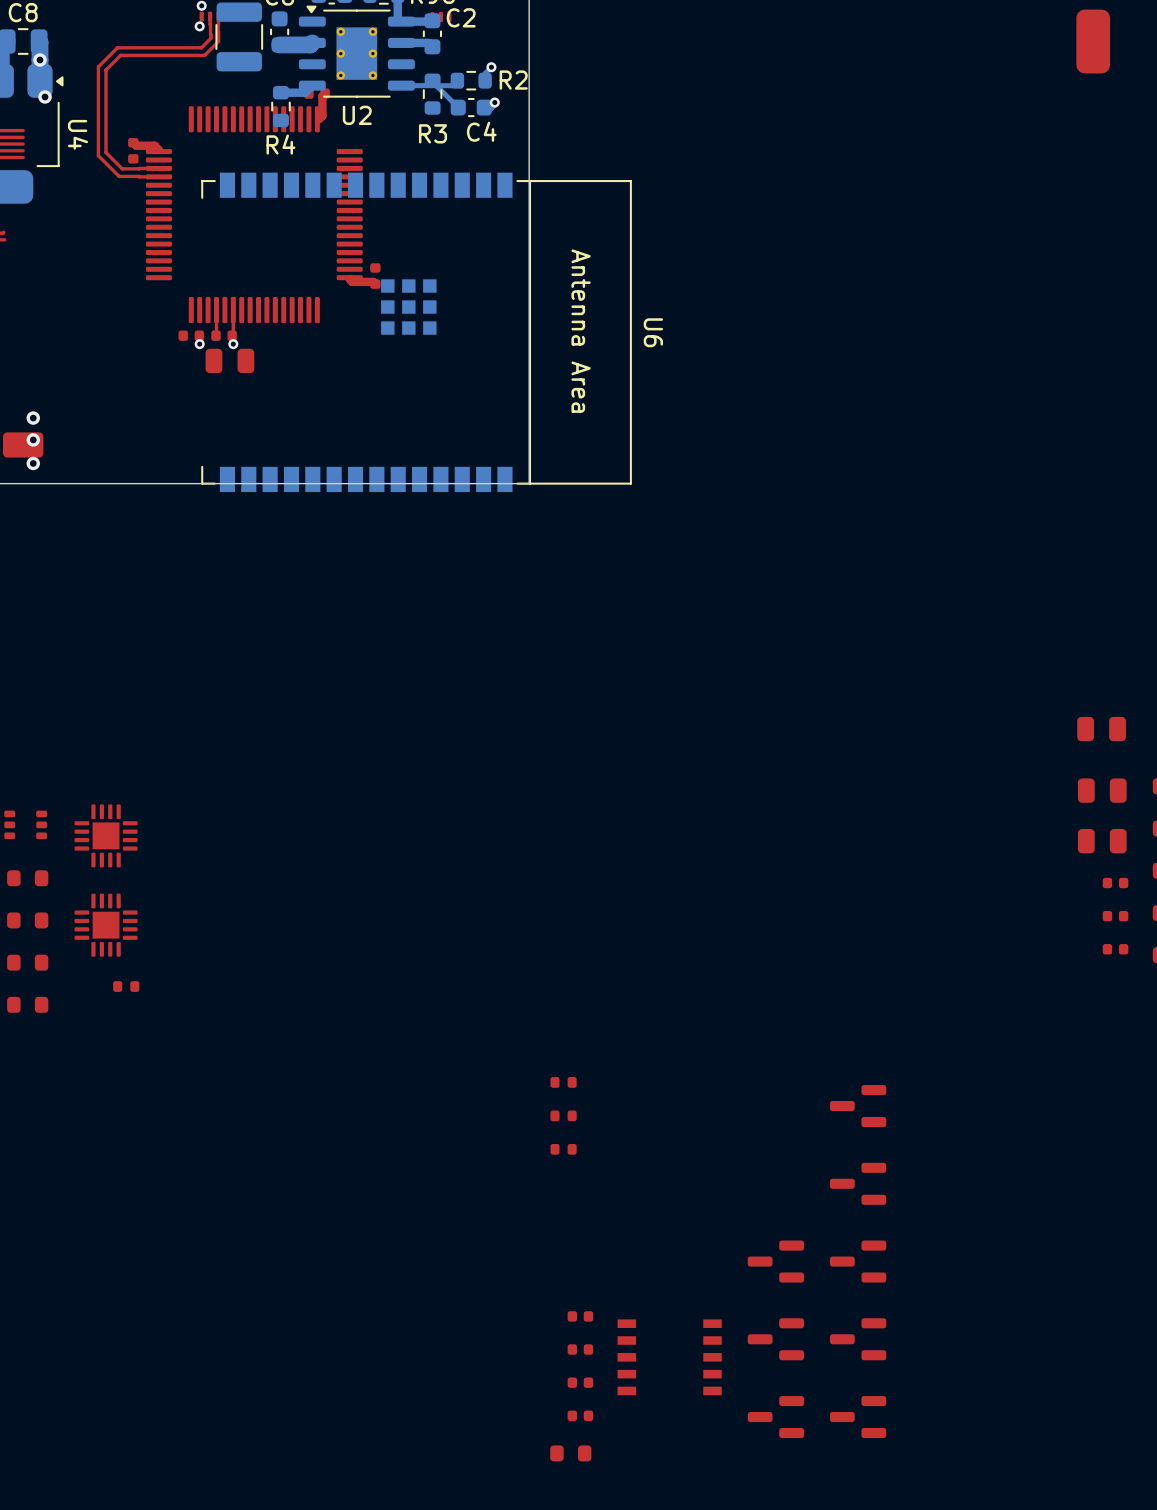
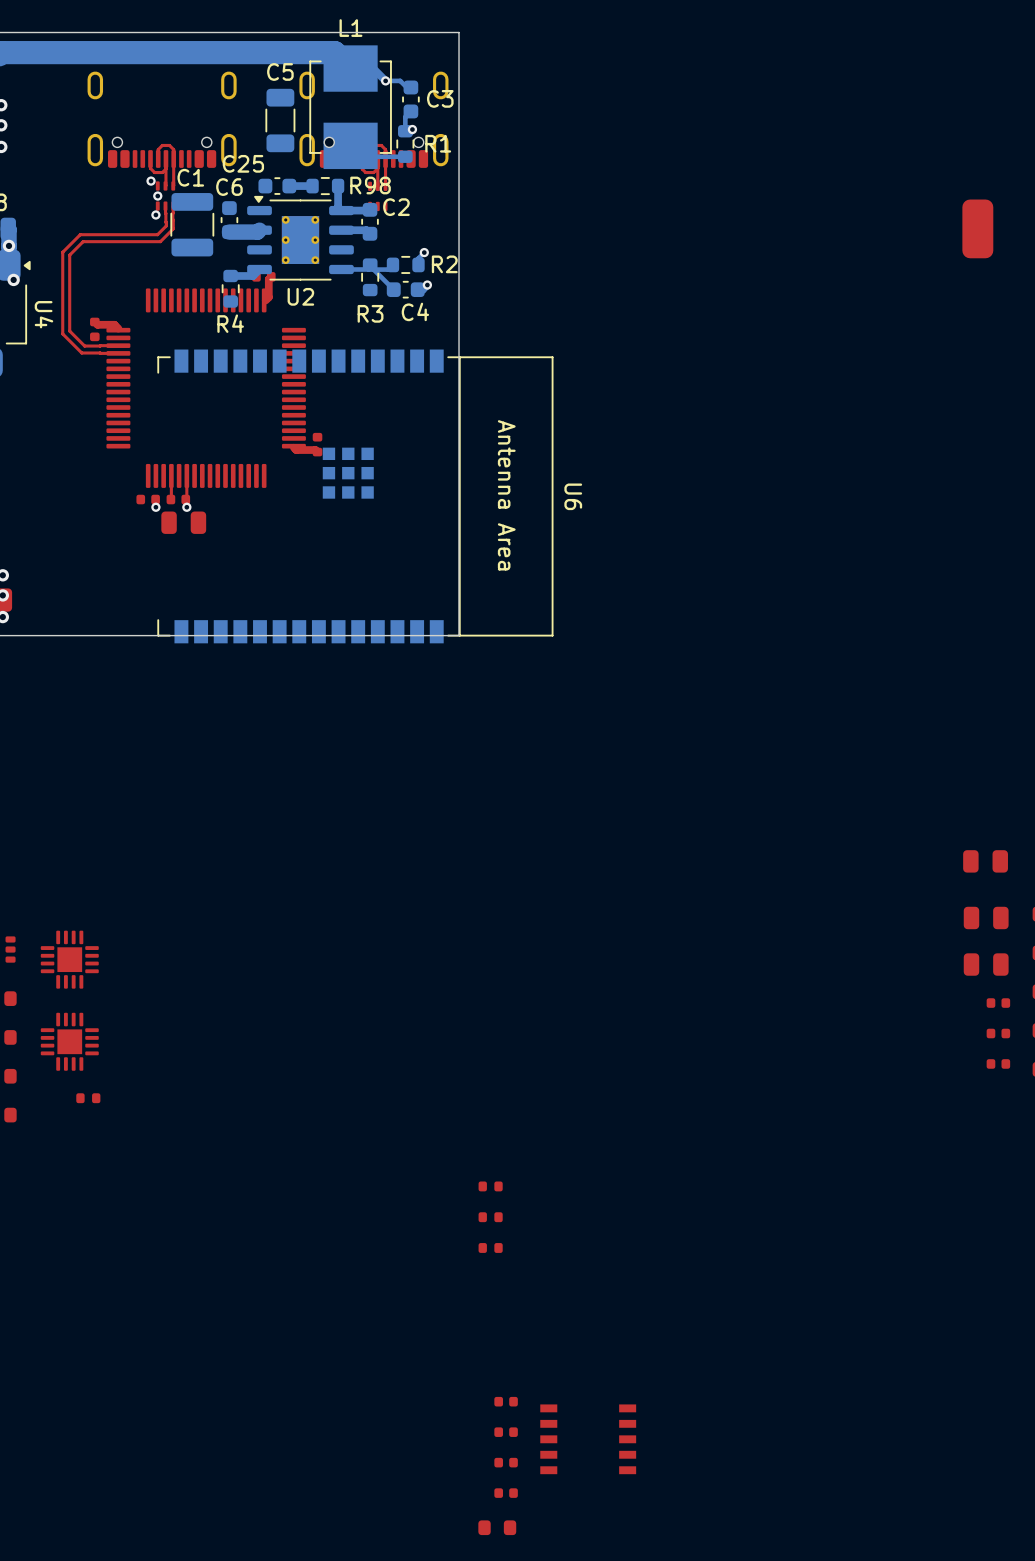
part: (858, 1106) -> none
part: (858, 1183) -> none
part: (775, 1261) -> none
part: (858, 1261) -> none
part: (775, 1339) -> none
part: (858, 1339) -> none
part: (775, 1417) -> none
part: (858, 1417) -> none

